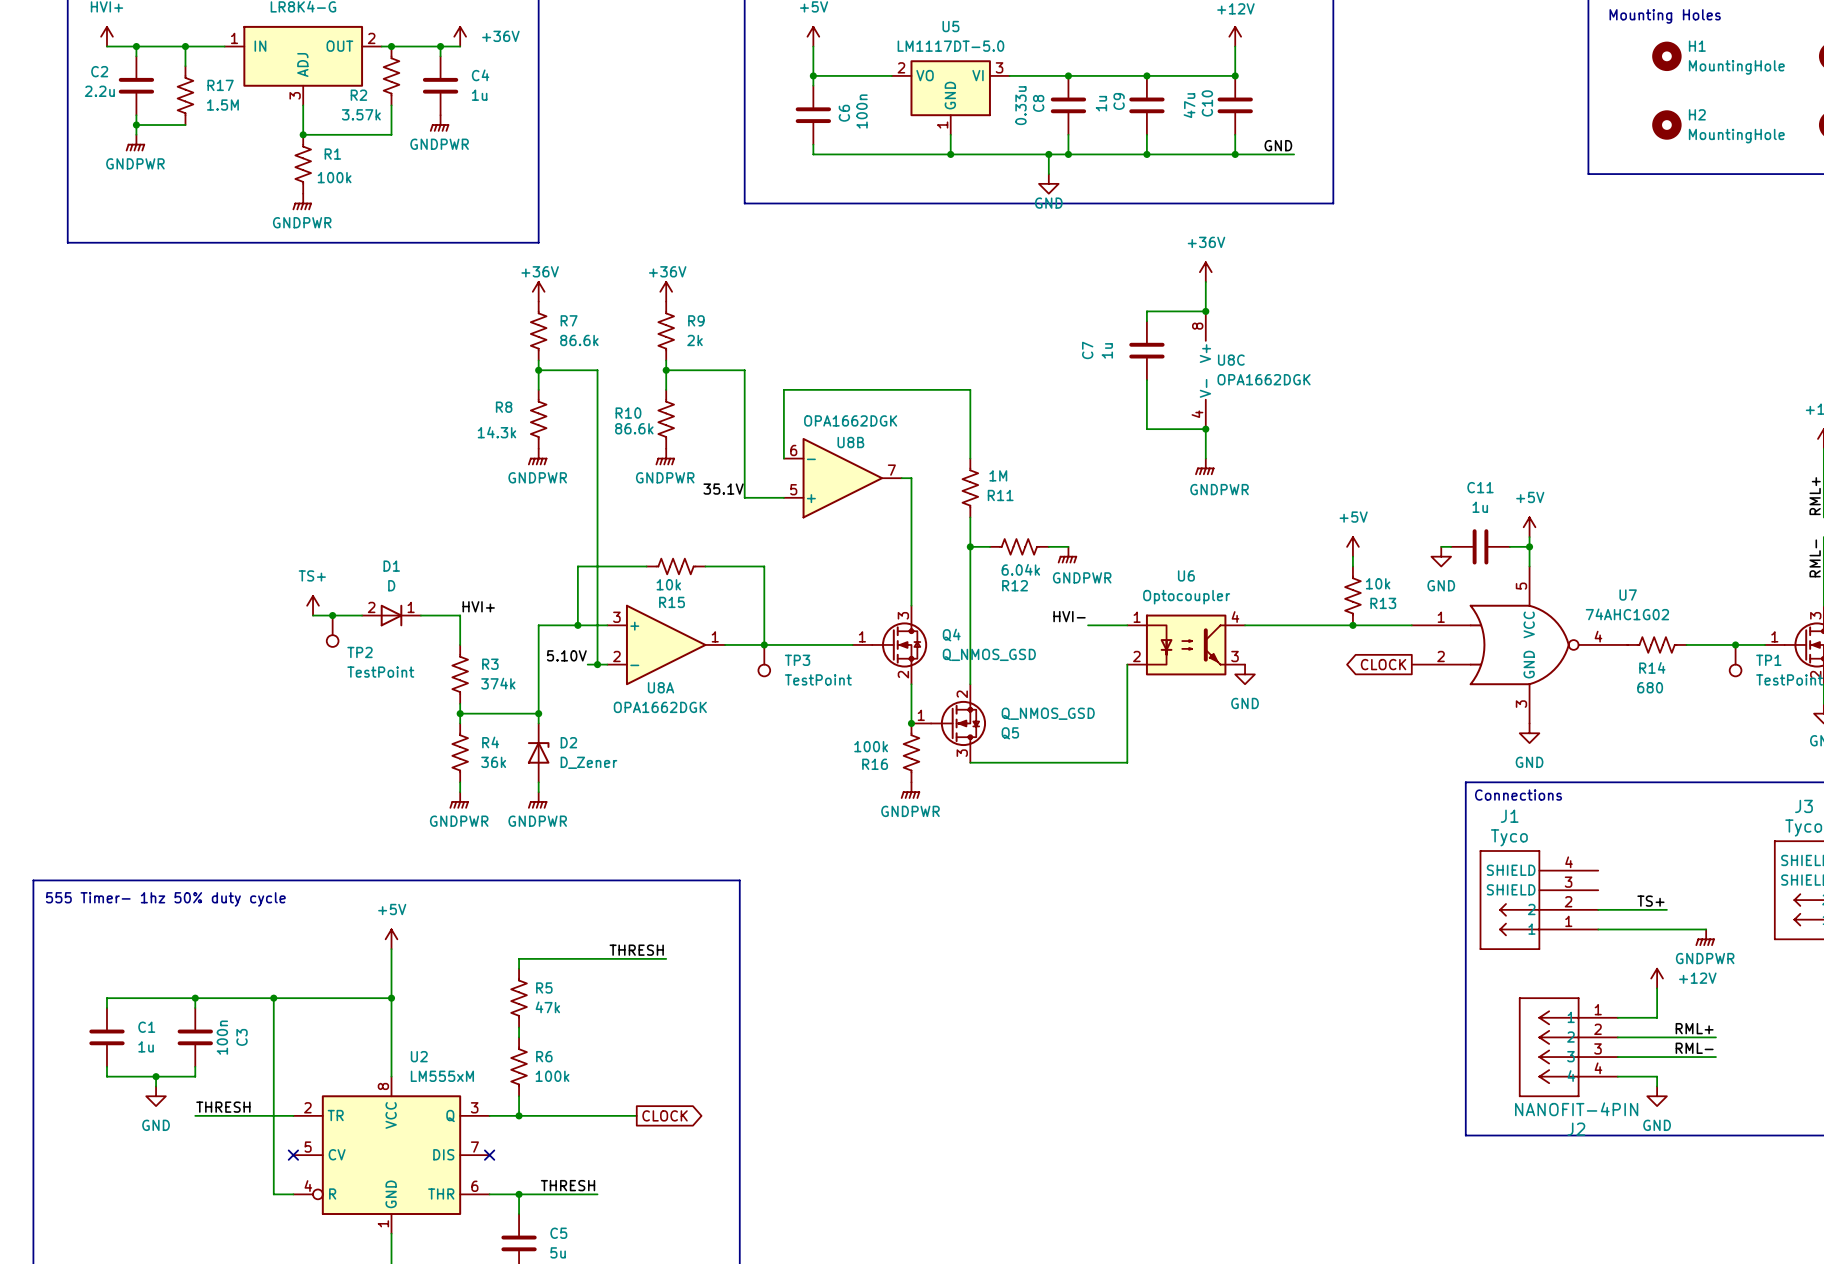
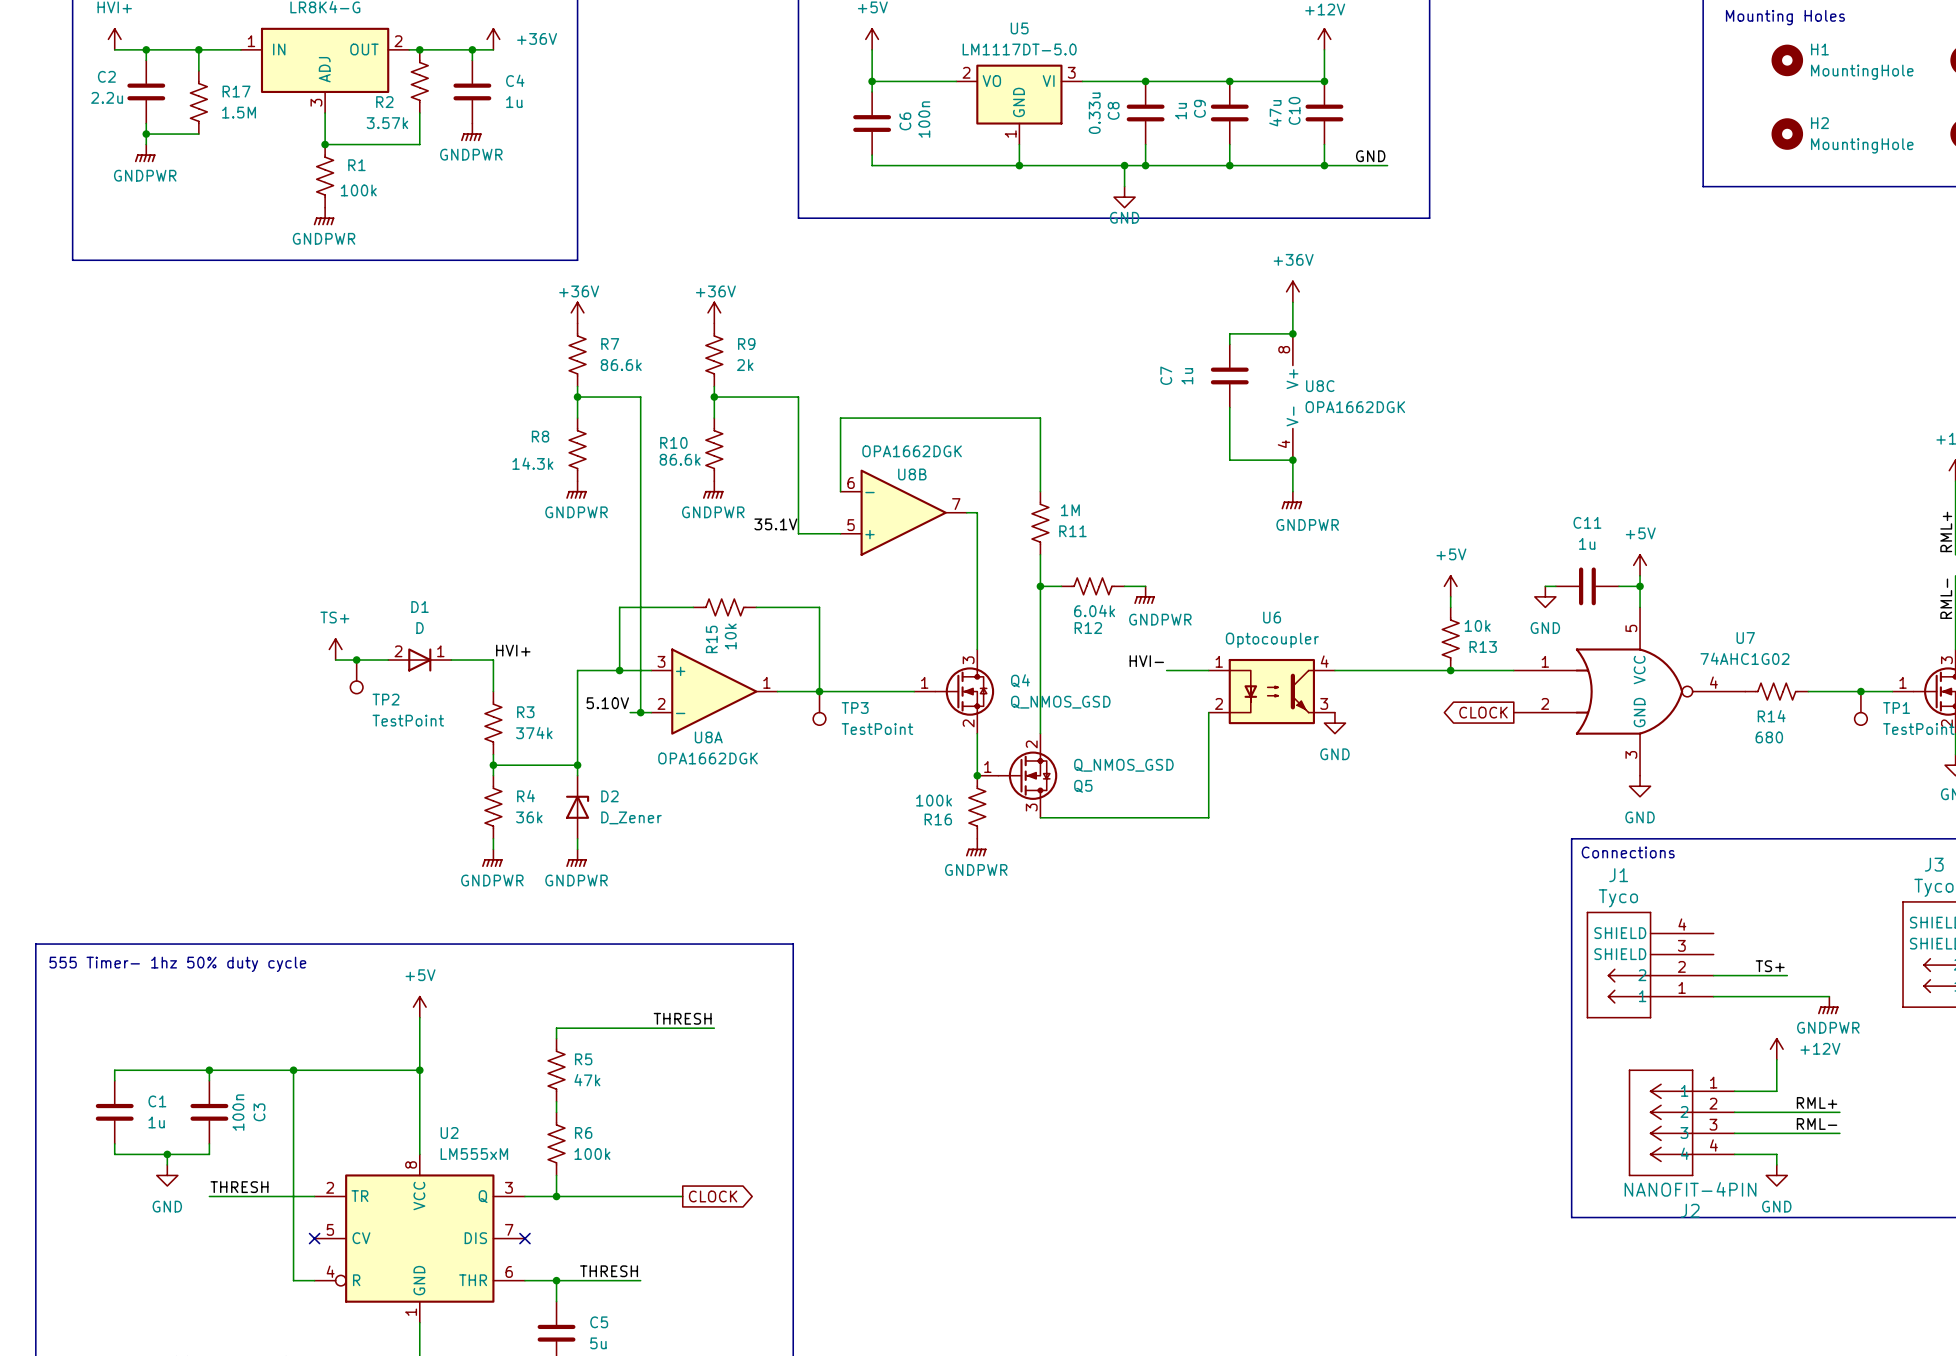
R15 value rotation: 0° (668, 584) -> 90° counterclockwise (730, 636)
R15 name rotation: 0° (672, 602) -> 90° counterclockwise (711, 639)

